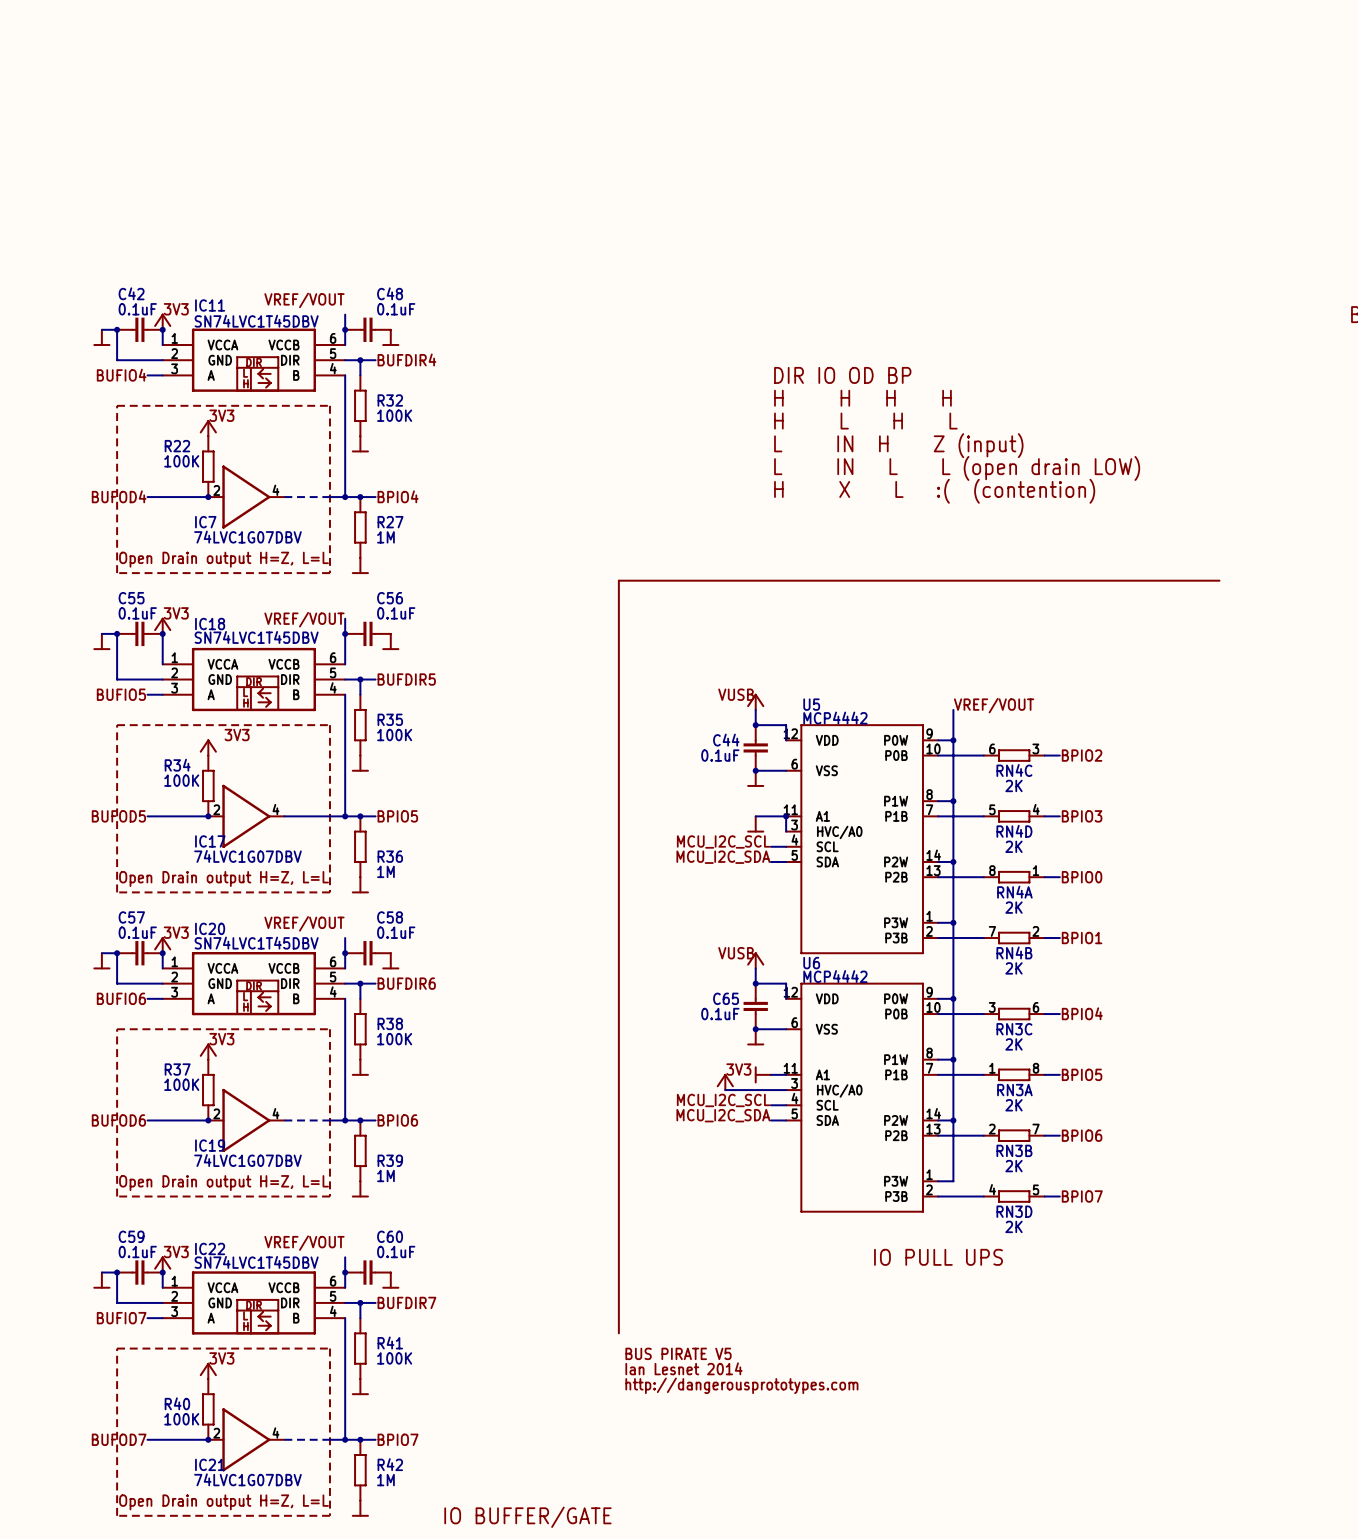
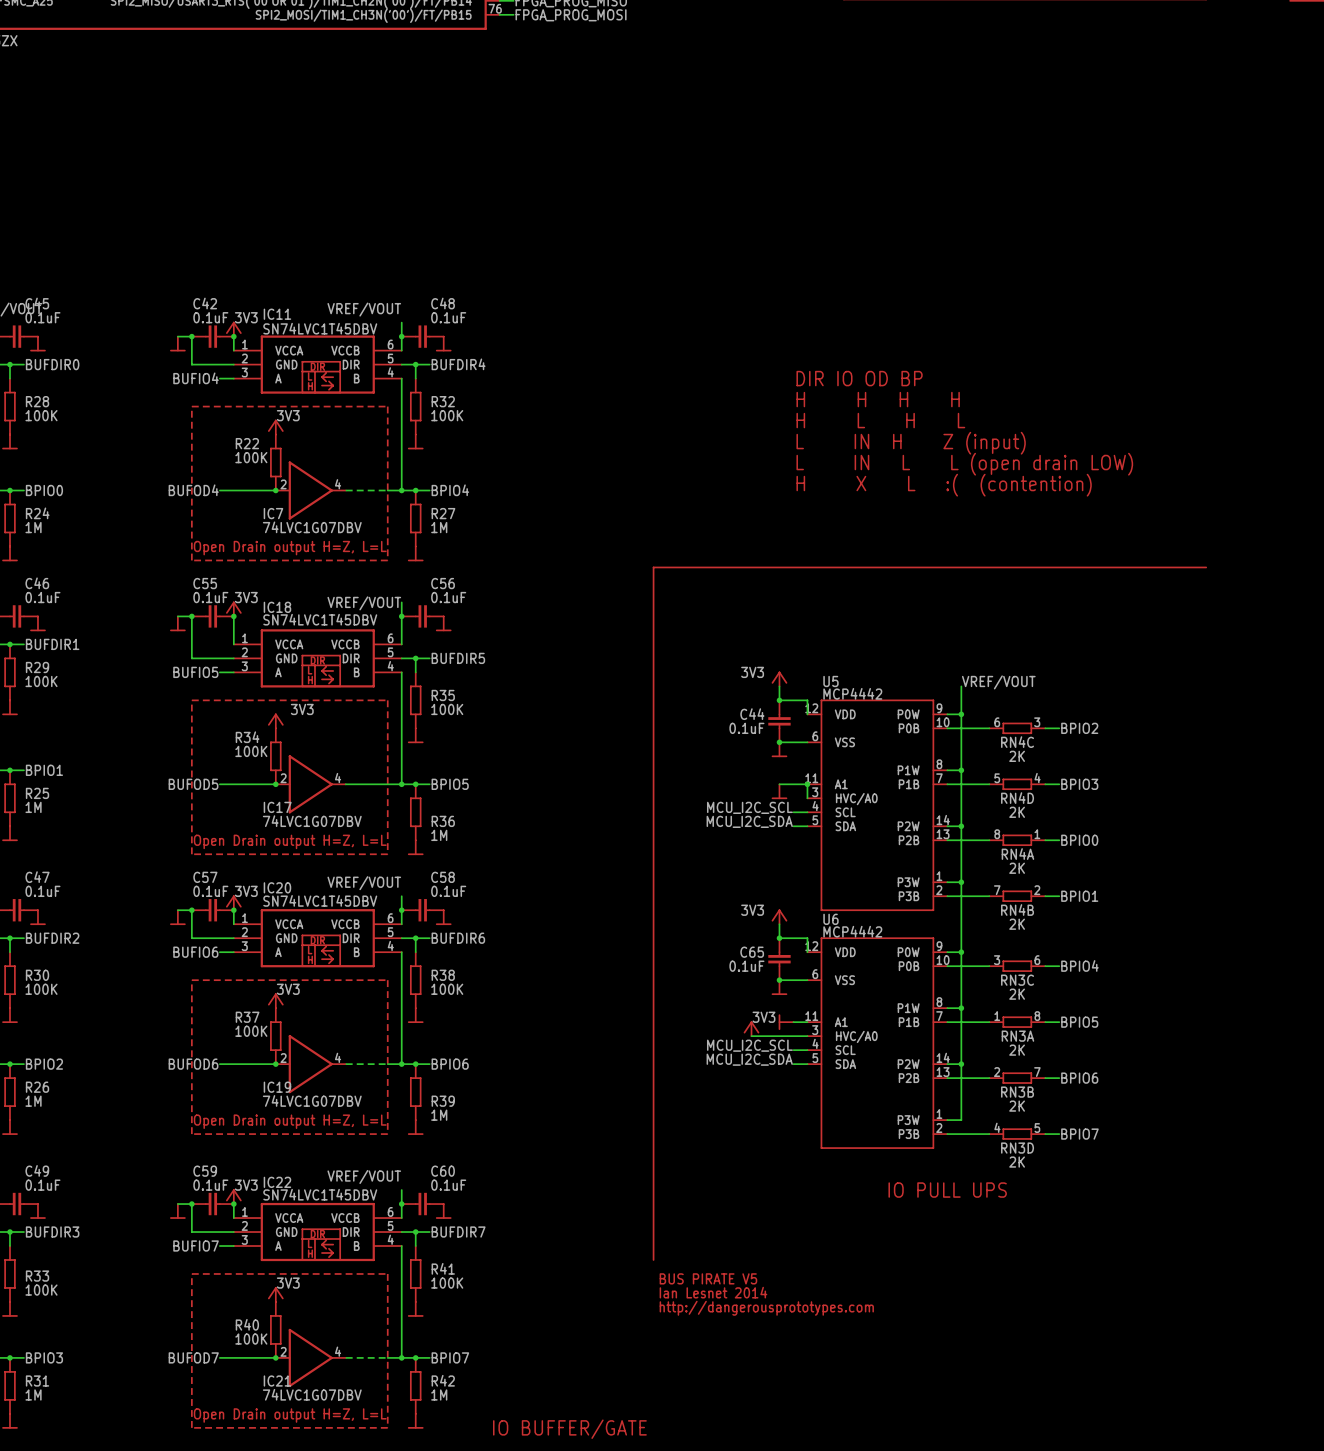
label: none -> 3V3 (752, 672)
label: VUSB (736, 694) -> none
label: none -> 3V3 (752, 910)
label: VUSB (736, 953) -> none

